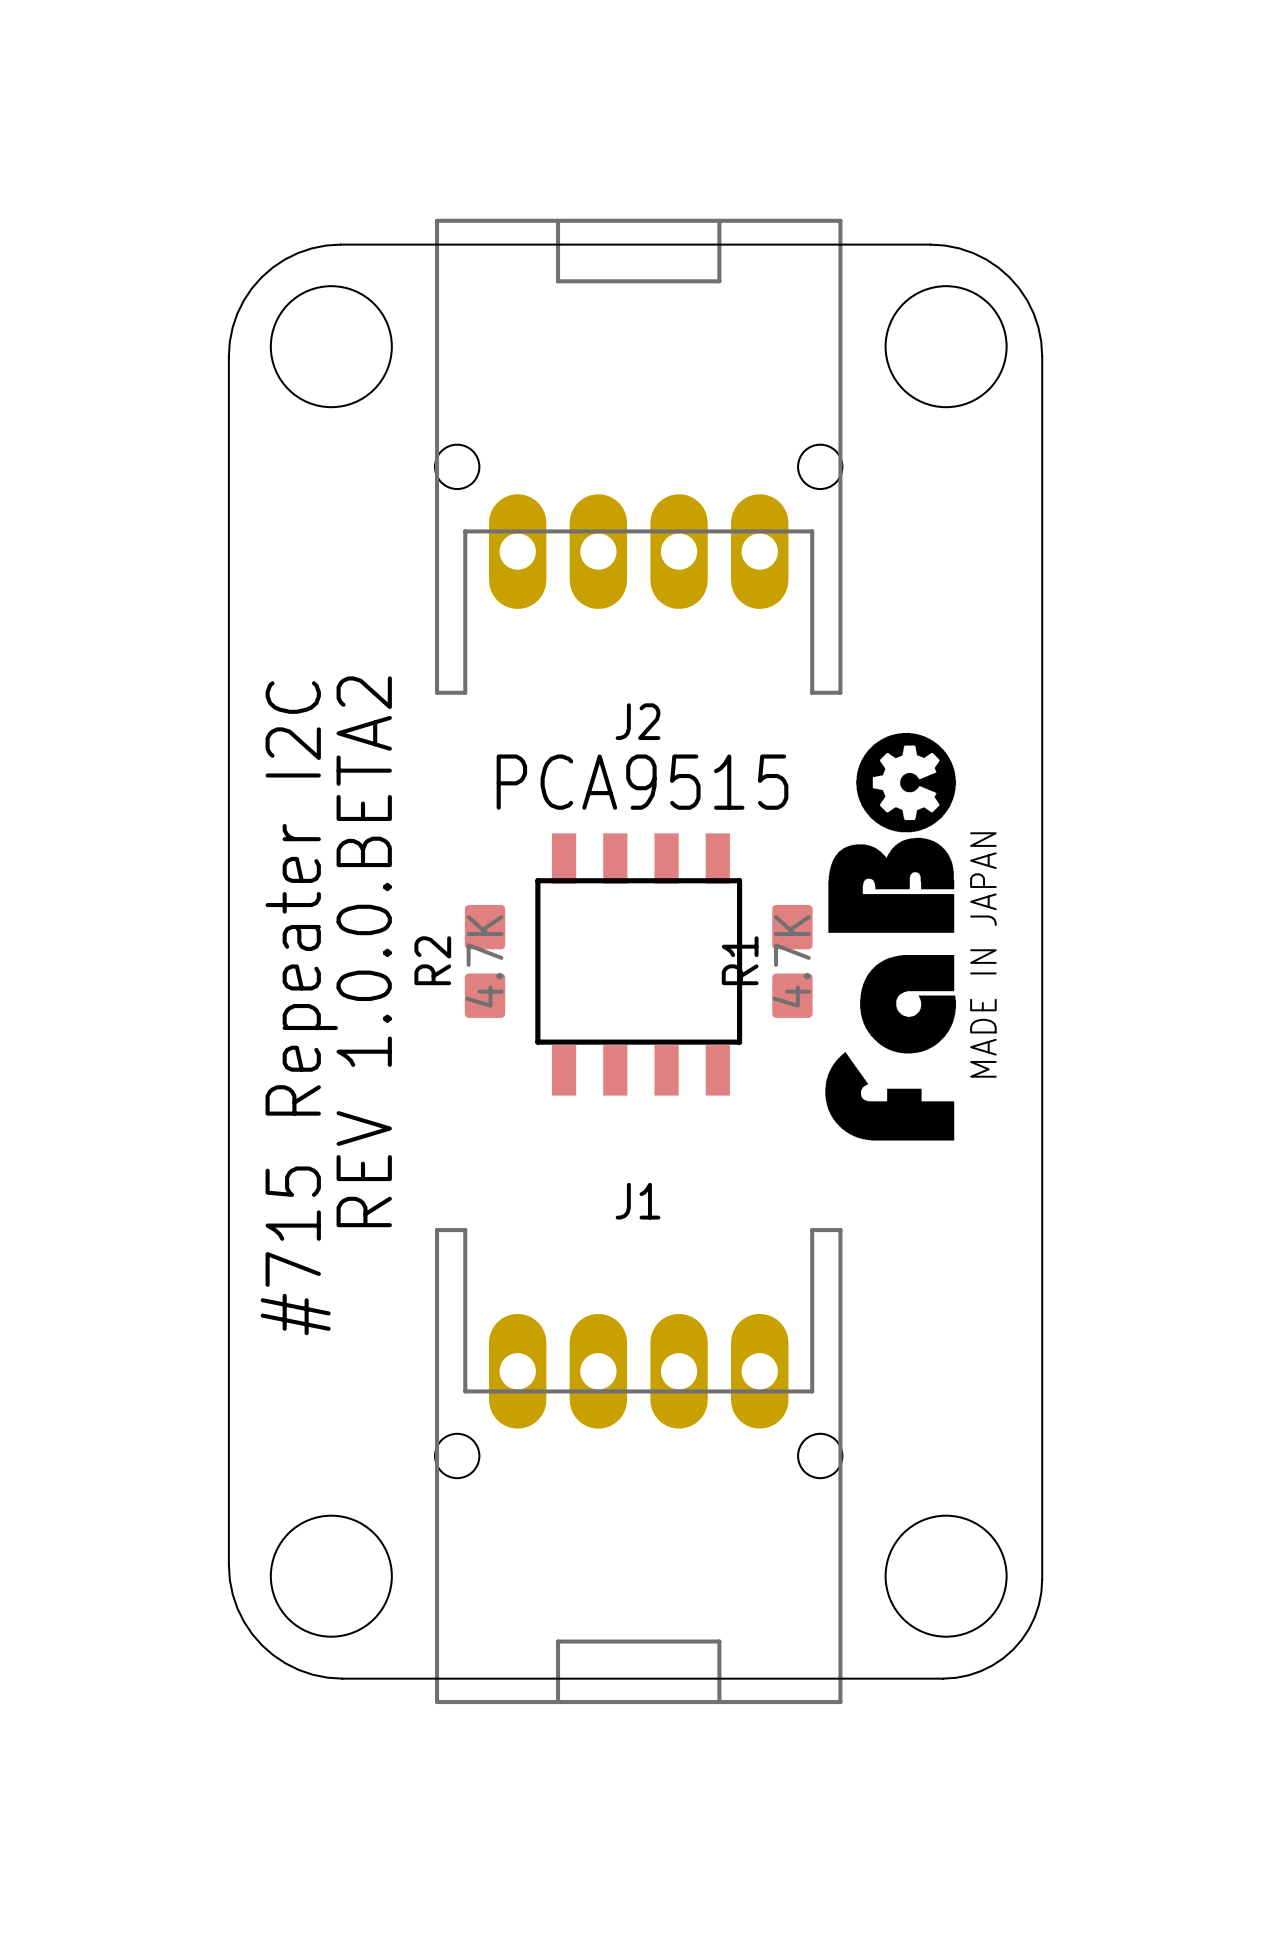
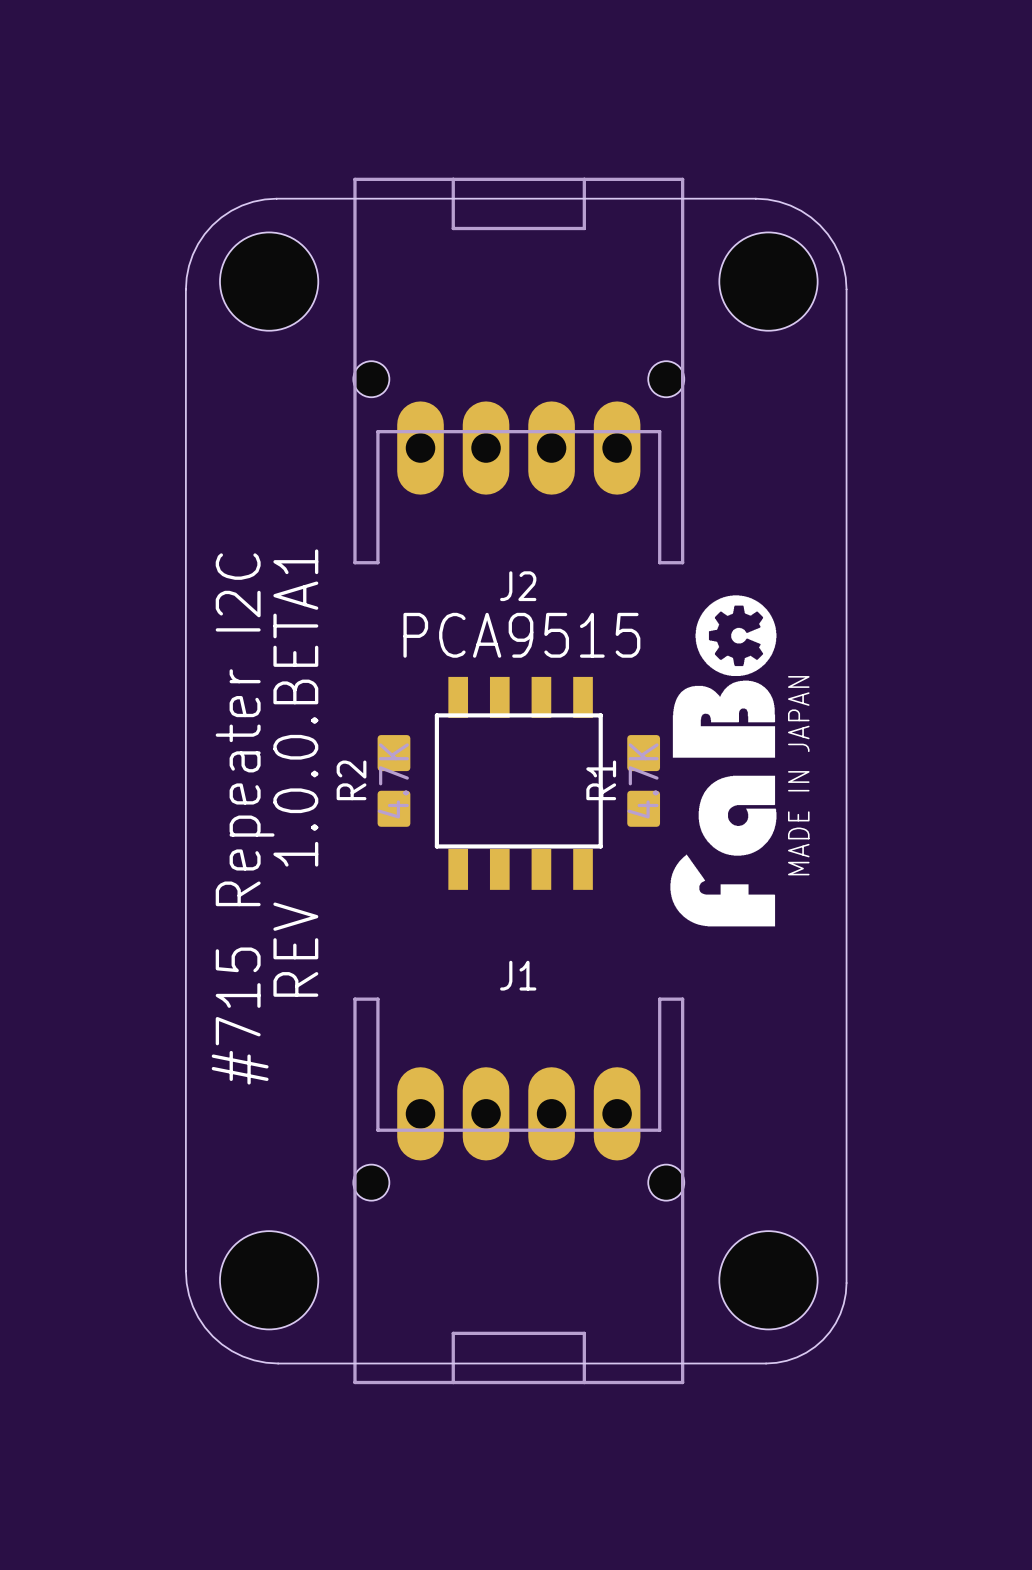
text: REV 1.0.0.BETA2 (364, 951) -> REV 1.0.0.BETA1 (295, 773)

